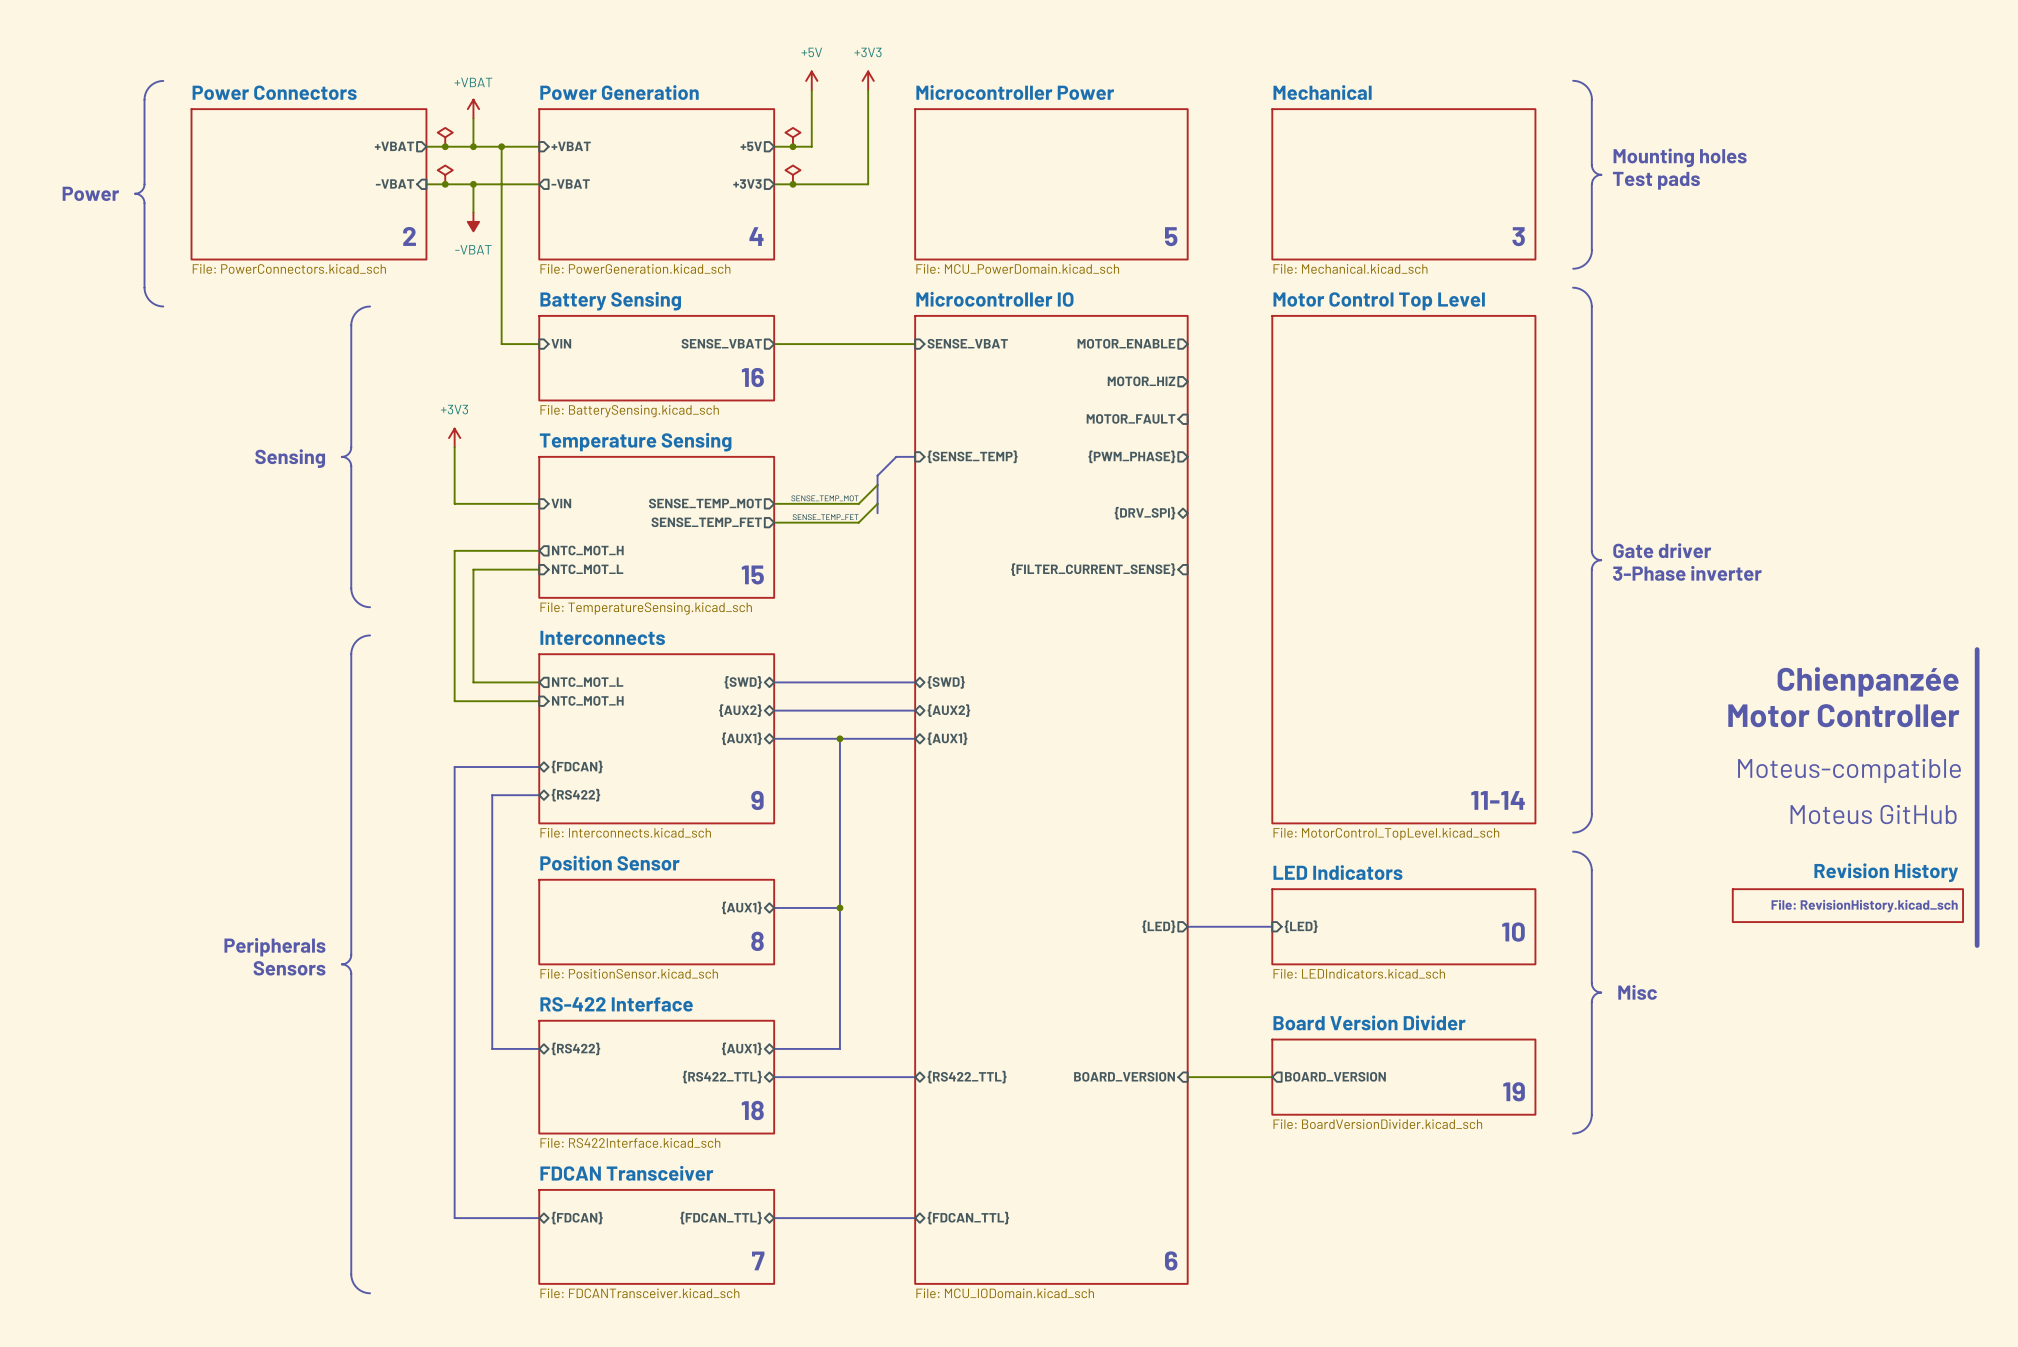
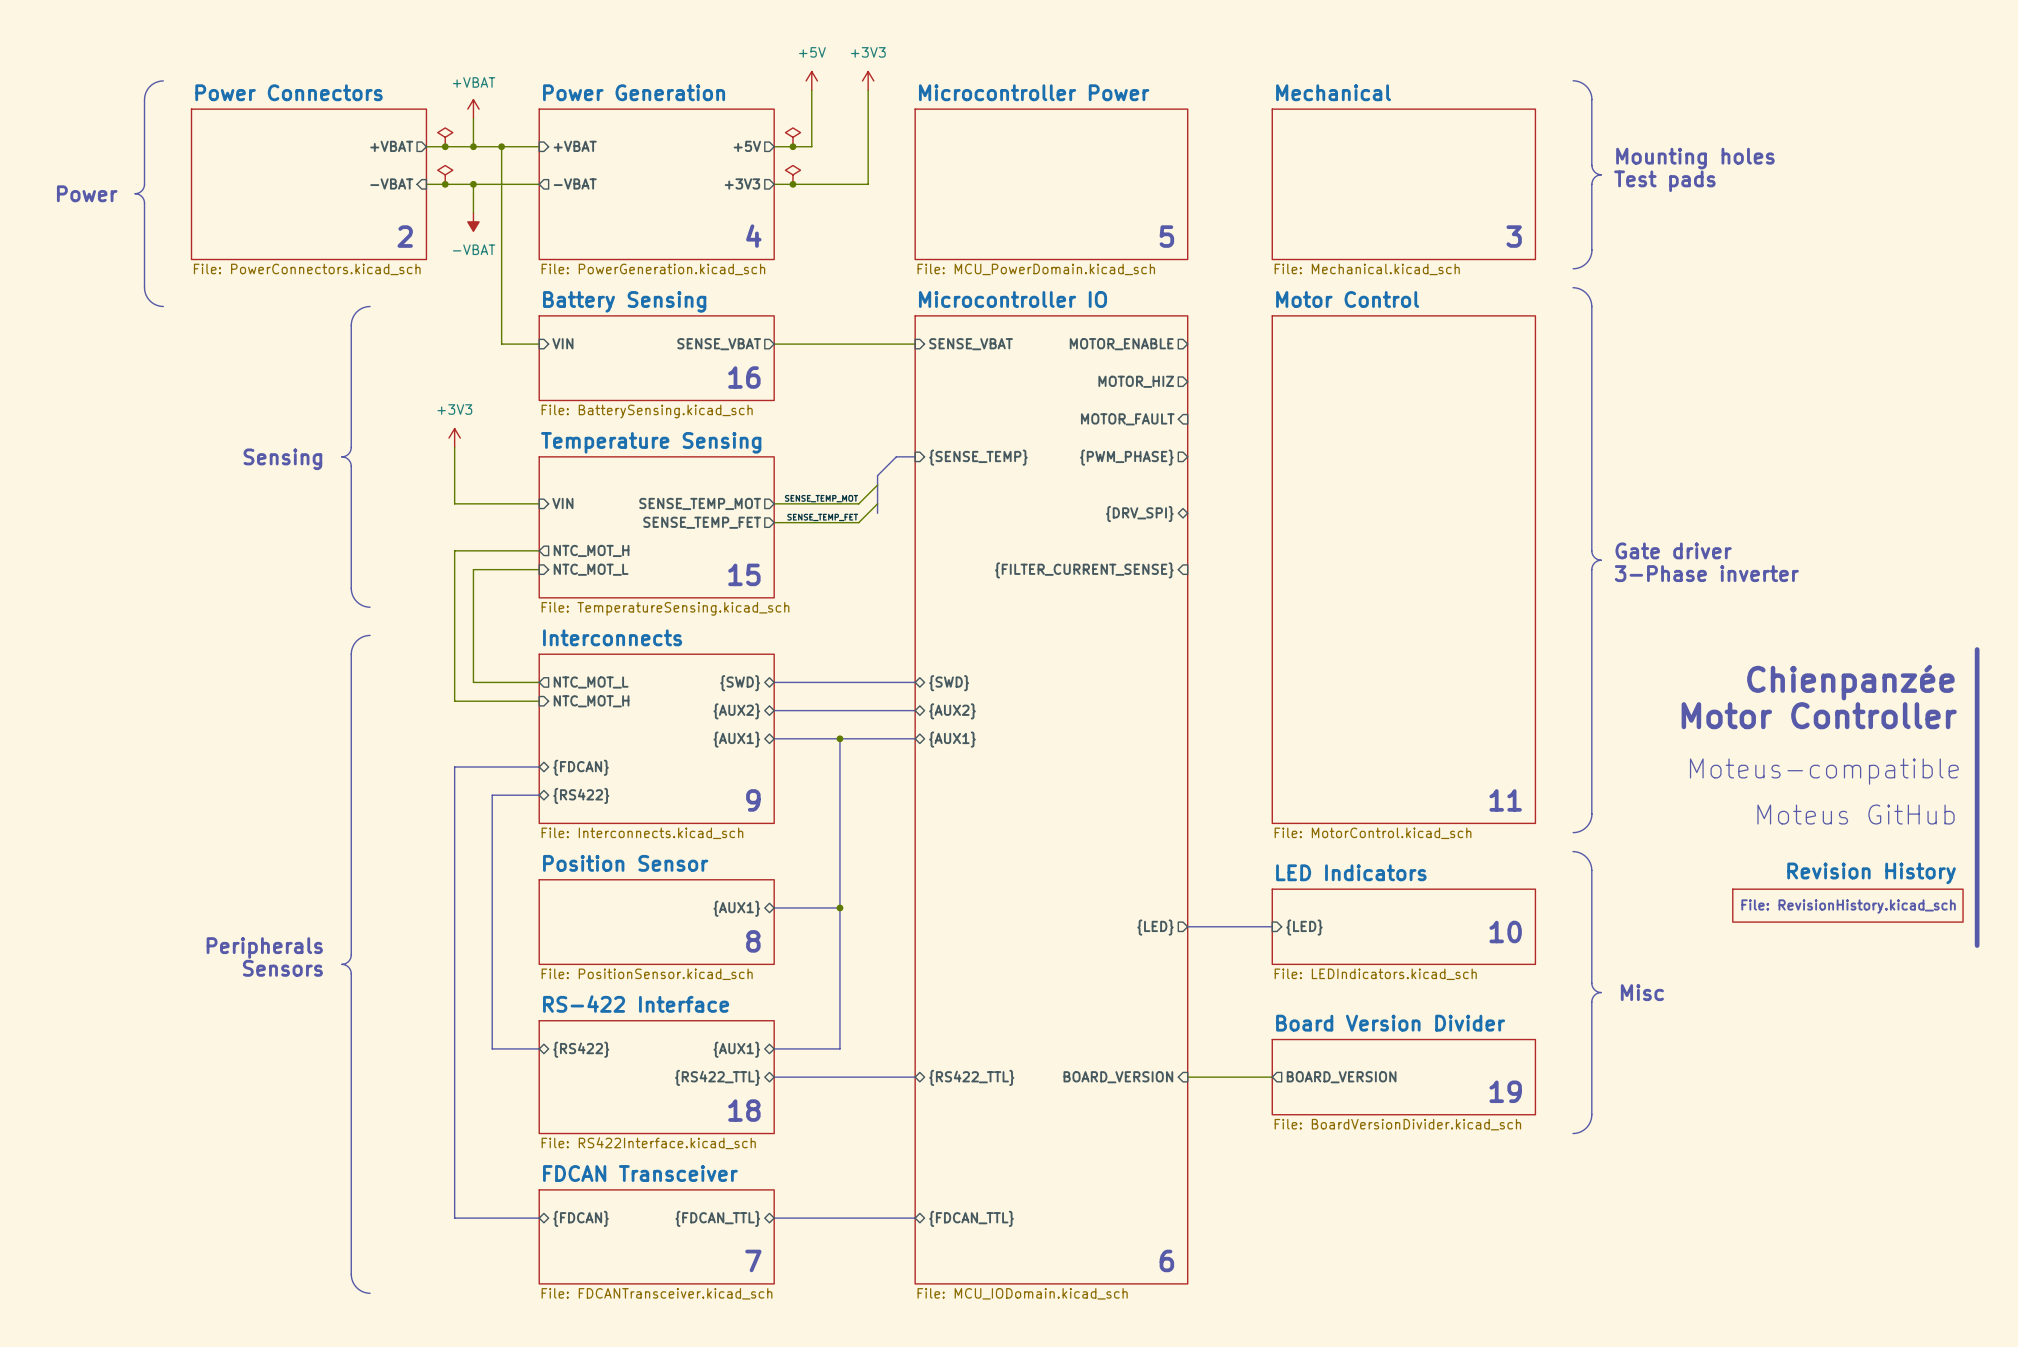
sheet Motor Control Top Level name: Motor Control Top Level (1379, 301) -> Motor Control (1347, 299)
text: 11-14 (1498, 800) -> 11 (1505, 800)
sheet Motor Control Top Level value: File: MotorControl_TopLevel.kicad_sch (1386, 834) -> File: MotorControl.kicad_sch (1373, 833)

